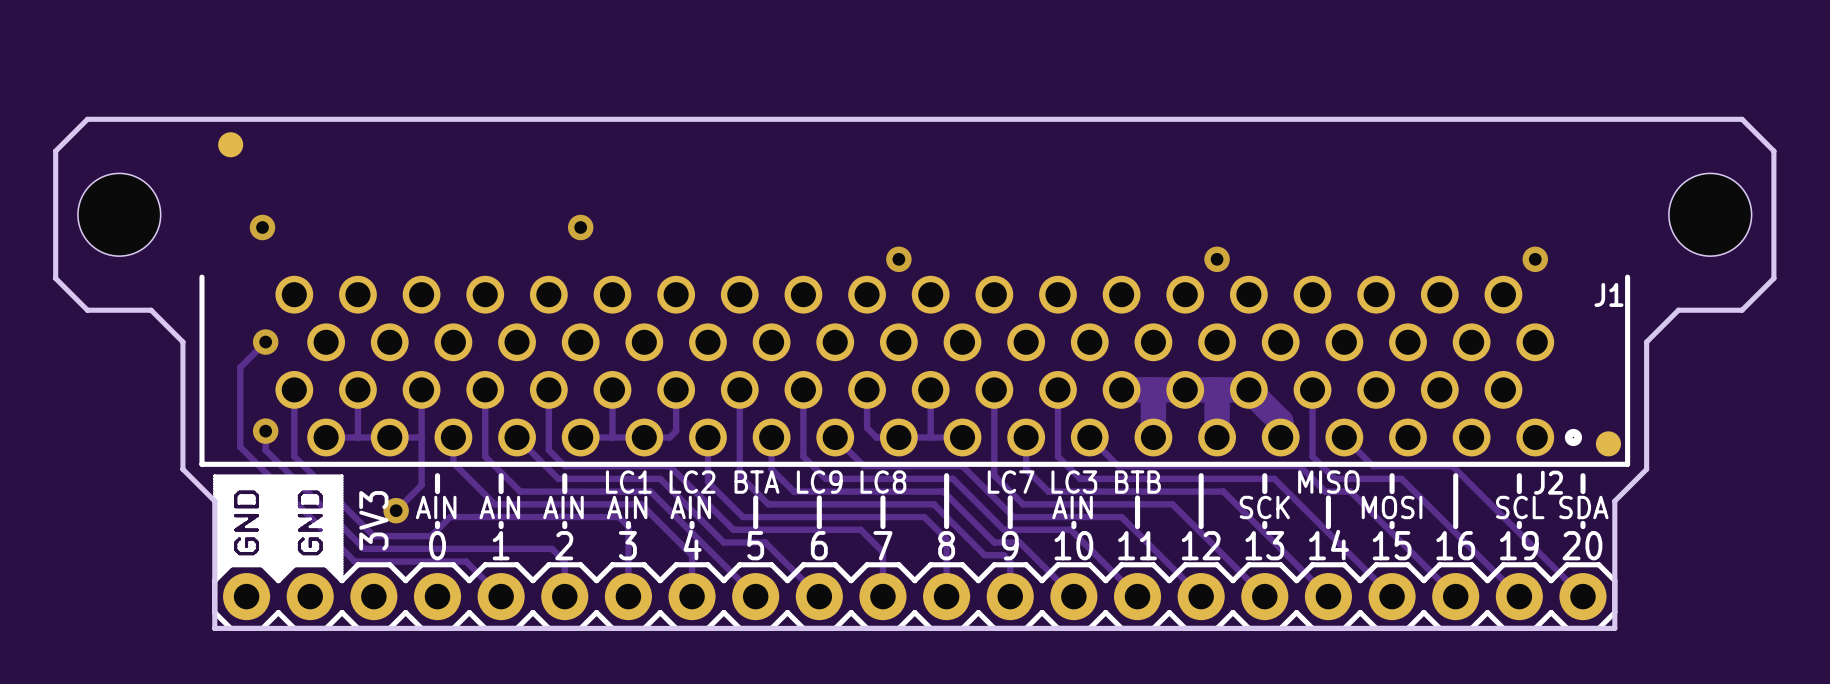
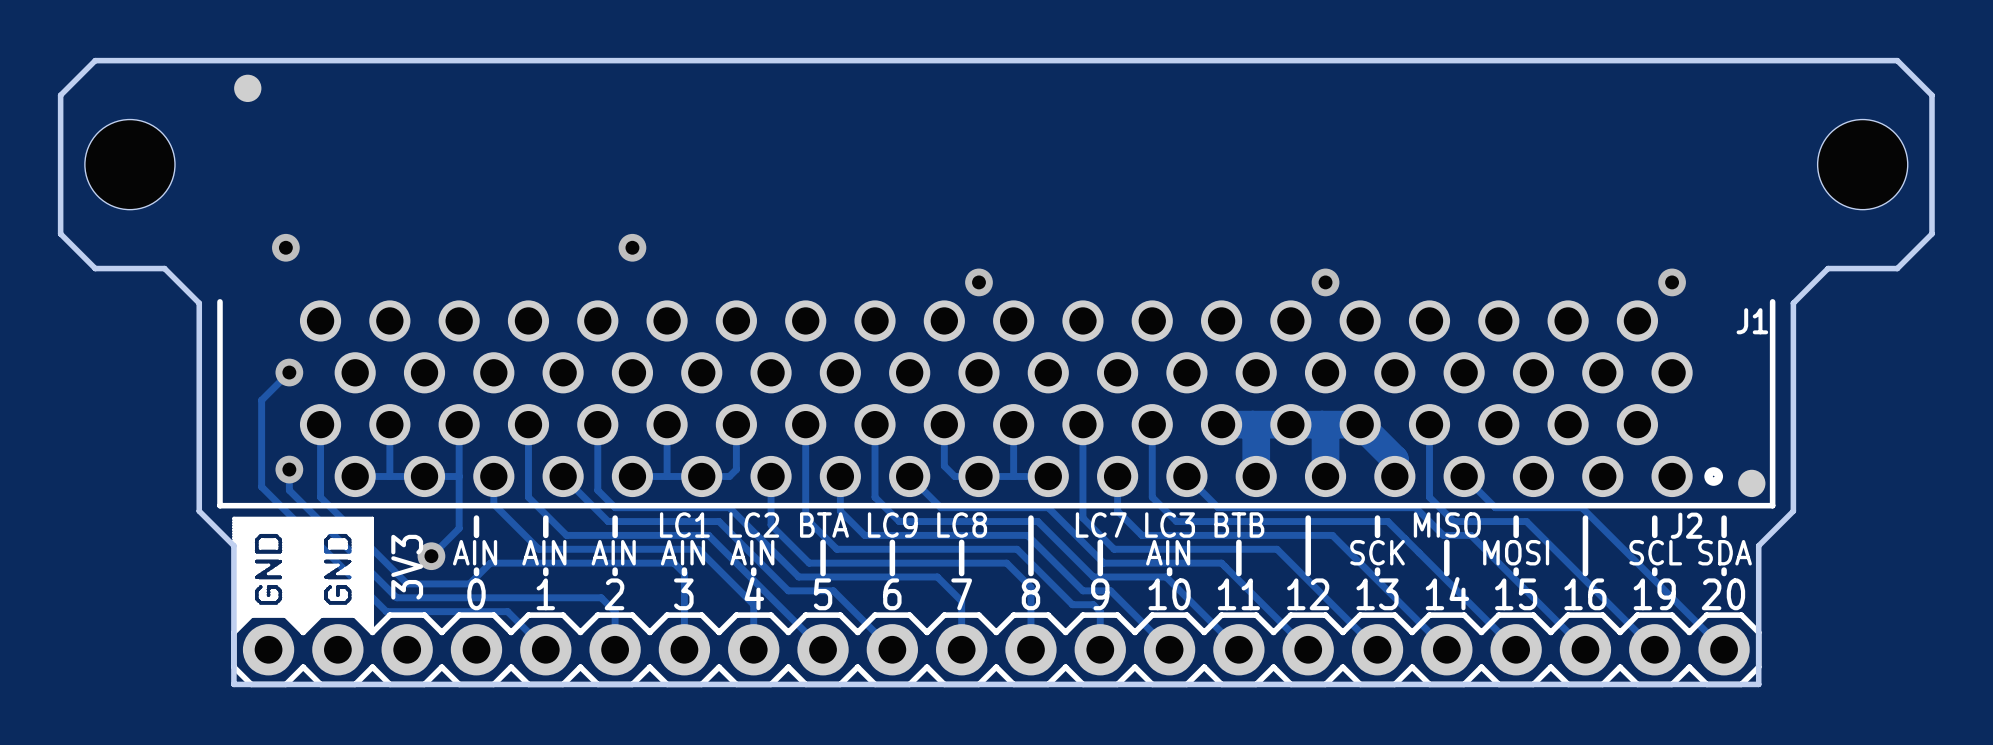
part position: (230, 144) -> (247, 88)
board edge: (55, 151) (87, 119) (1742, 119) (1773, 151) -> (60, 164) (60, 95) (95, 60) (1897, 60) (1931, 95) (1931, 164)
board edge: (55, 214) (55, 278) (87, 310) (151, 310) (182, 342) -> (60, 233) (95, 268) (164, 268) (199, 303) (199, 372)
part position: (119, 214) -> (129, 164)
part position: (1710, 214) -> (1862, 164)
board edge: (1773, 214) (1773, 278) (1742, 310) (1678, 310) (1646, 342) -> (1931, 233) (1897, 268) (1828, 268) (1793, 303) (1793, 372)

